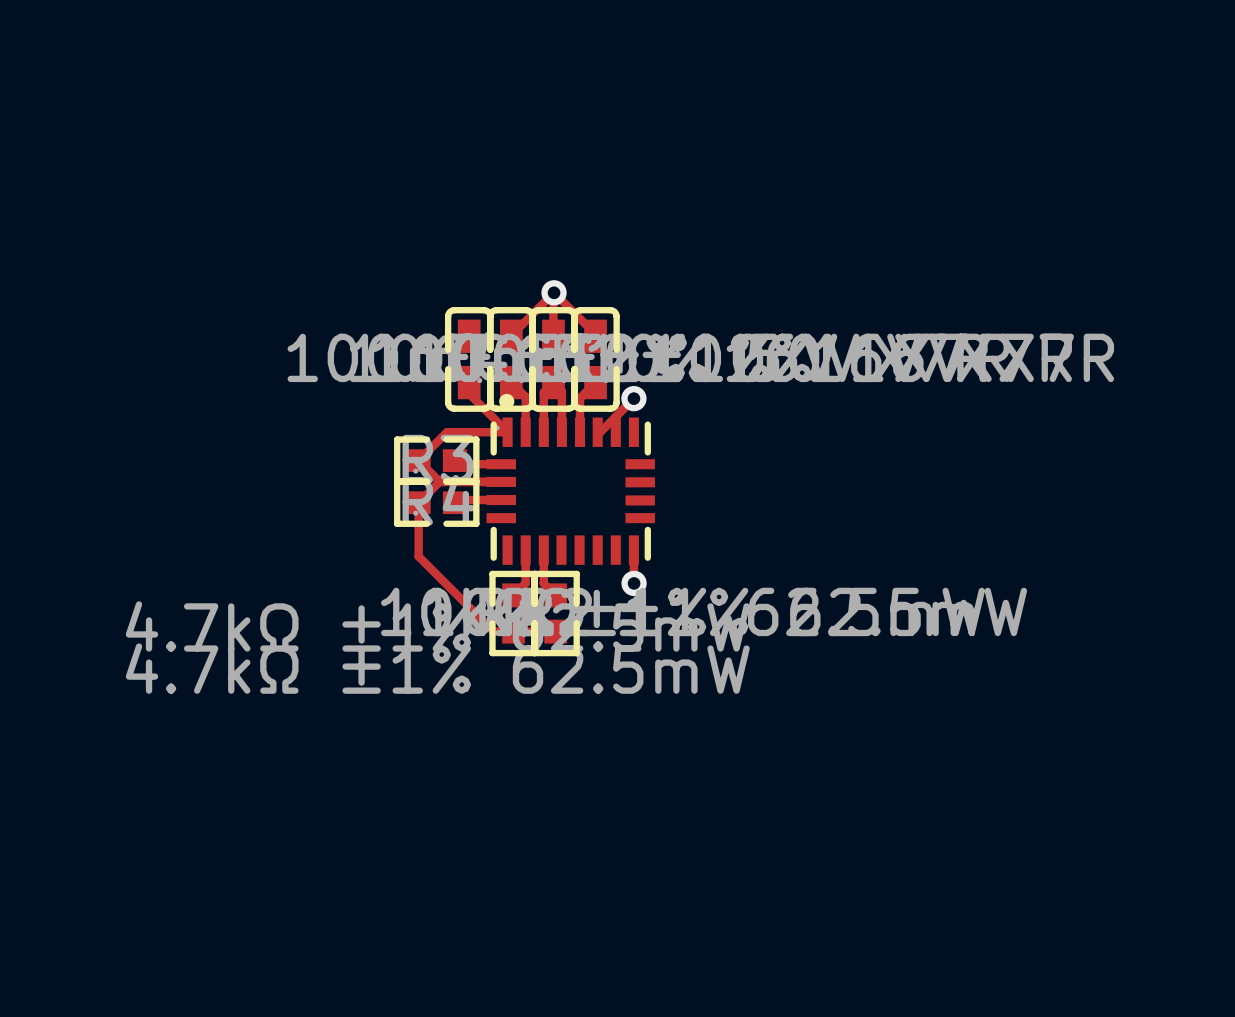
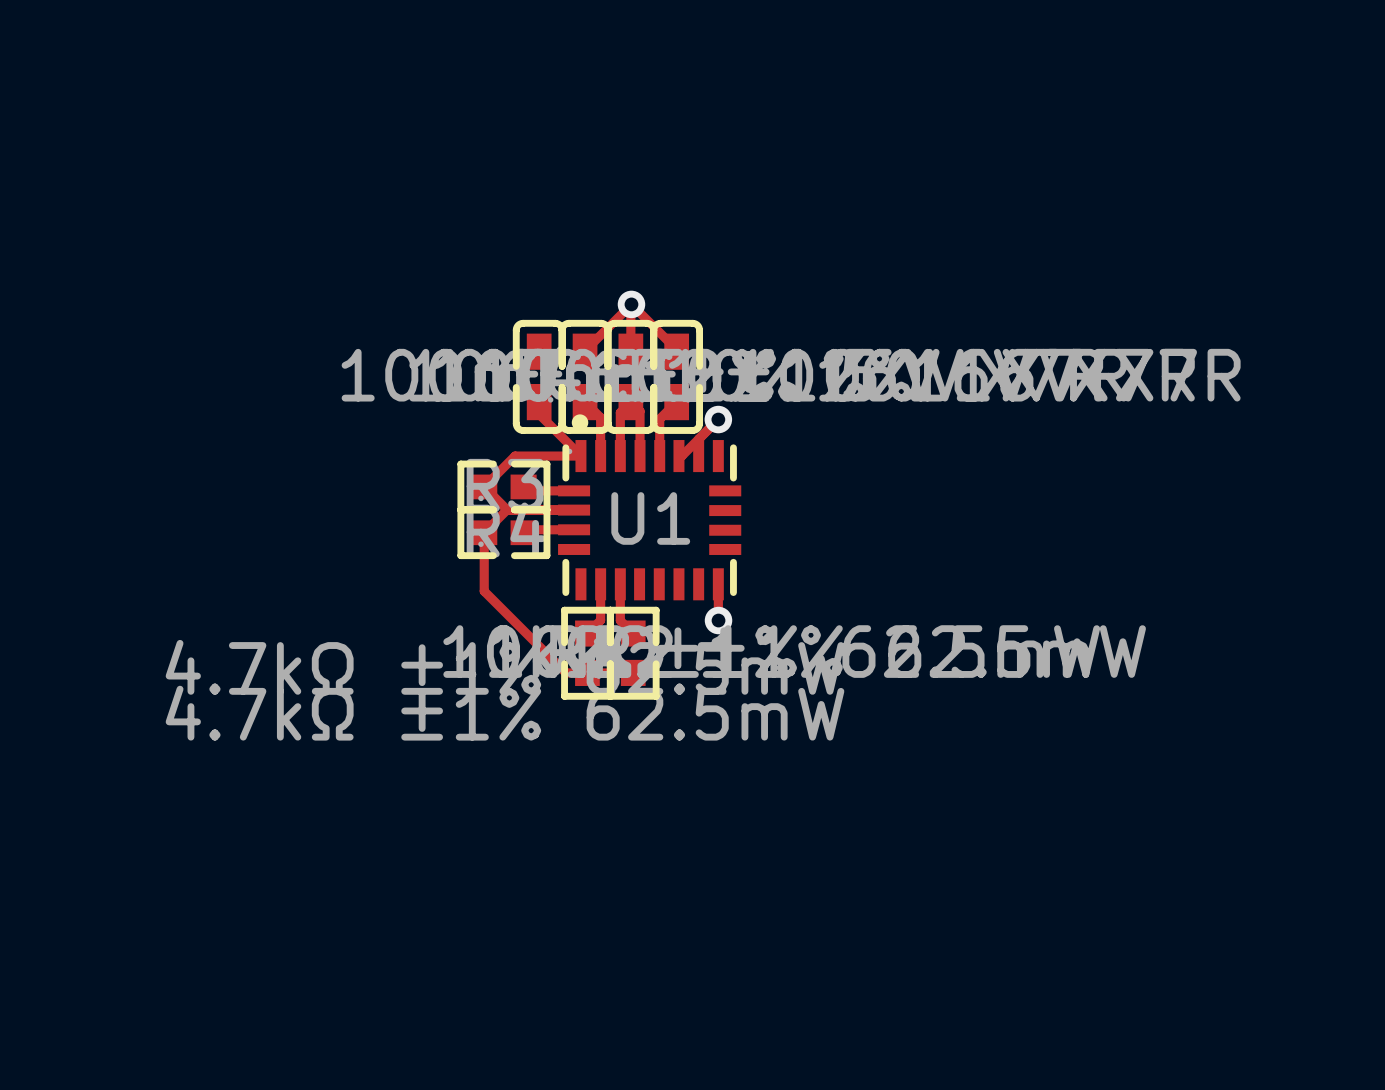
U1 name: none -> U1 (650, 518)

